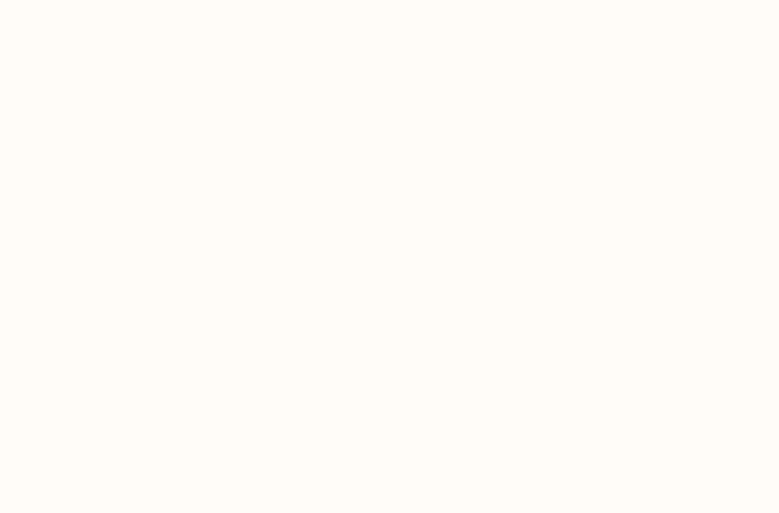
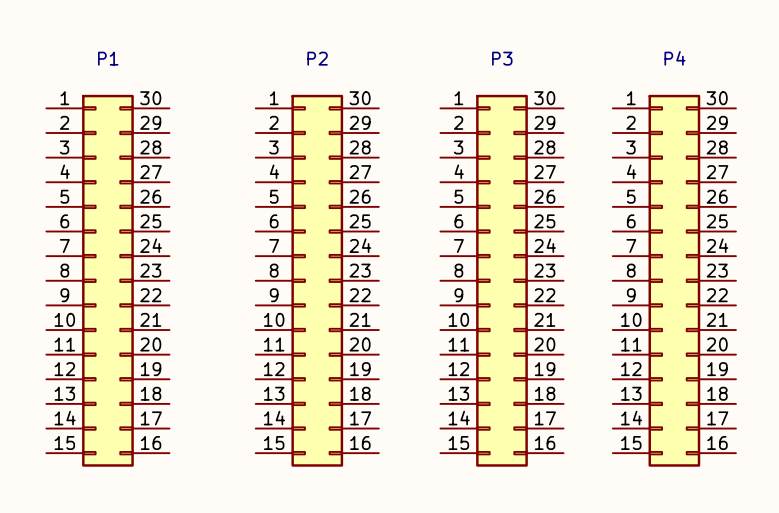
P1: none -> (107, 280)
P2: none -> (317, 280)
P3: none -> (501, 280)
P4: none -> (674, 280)

